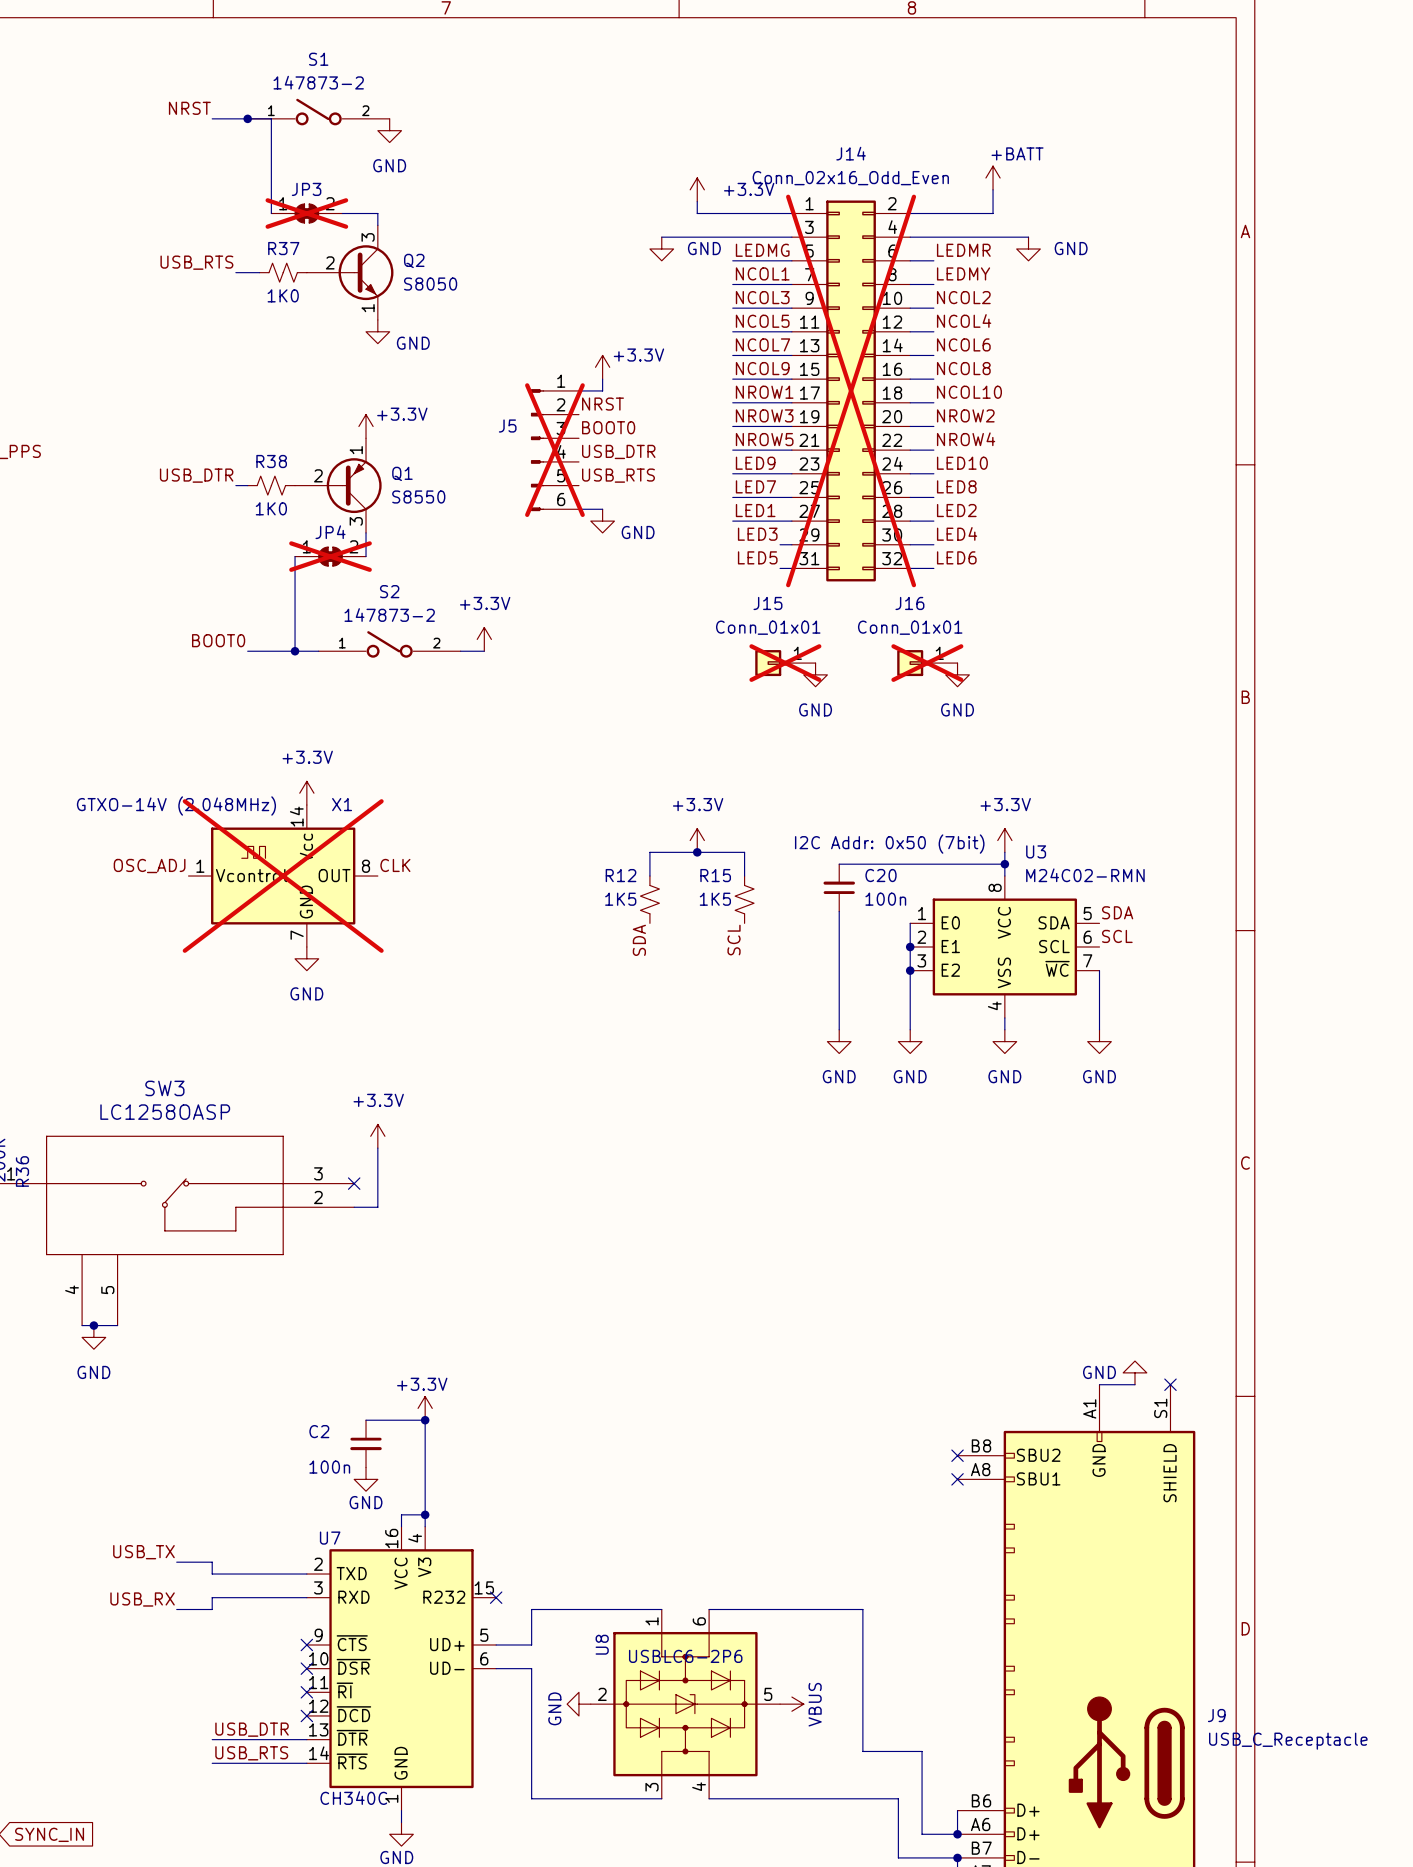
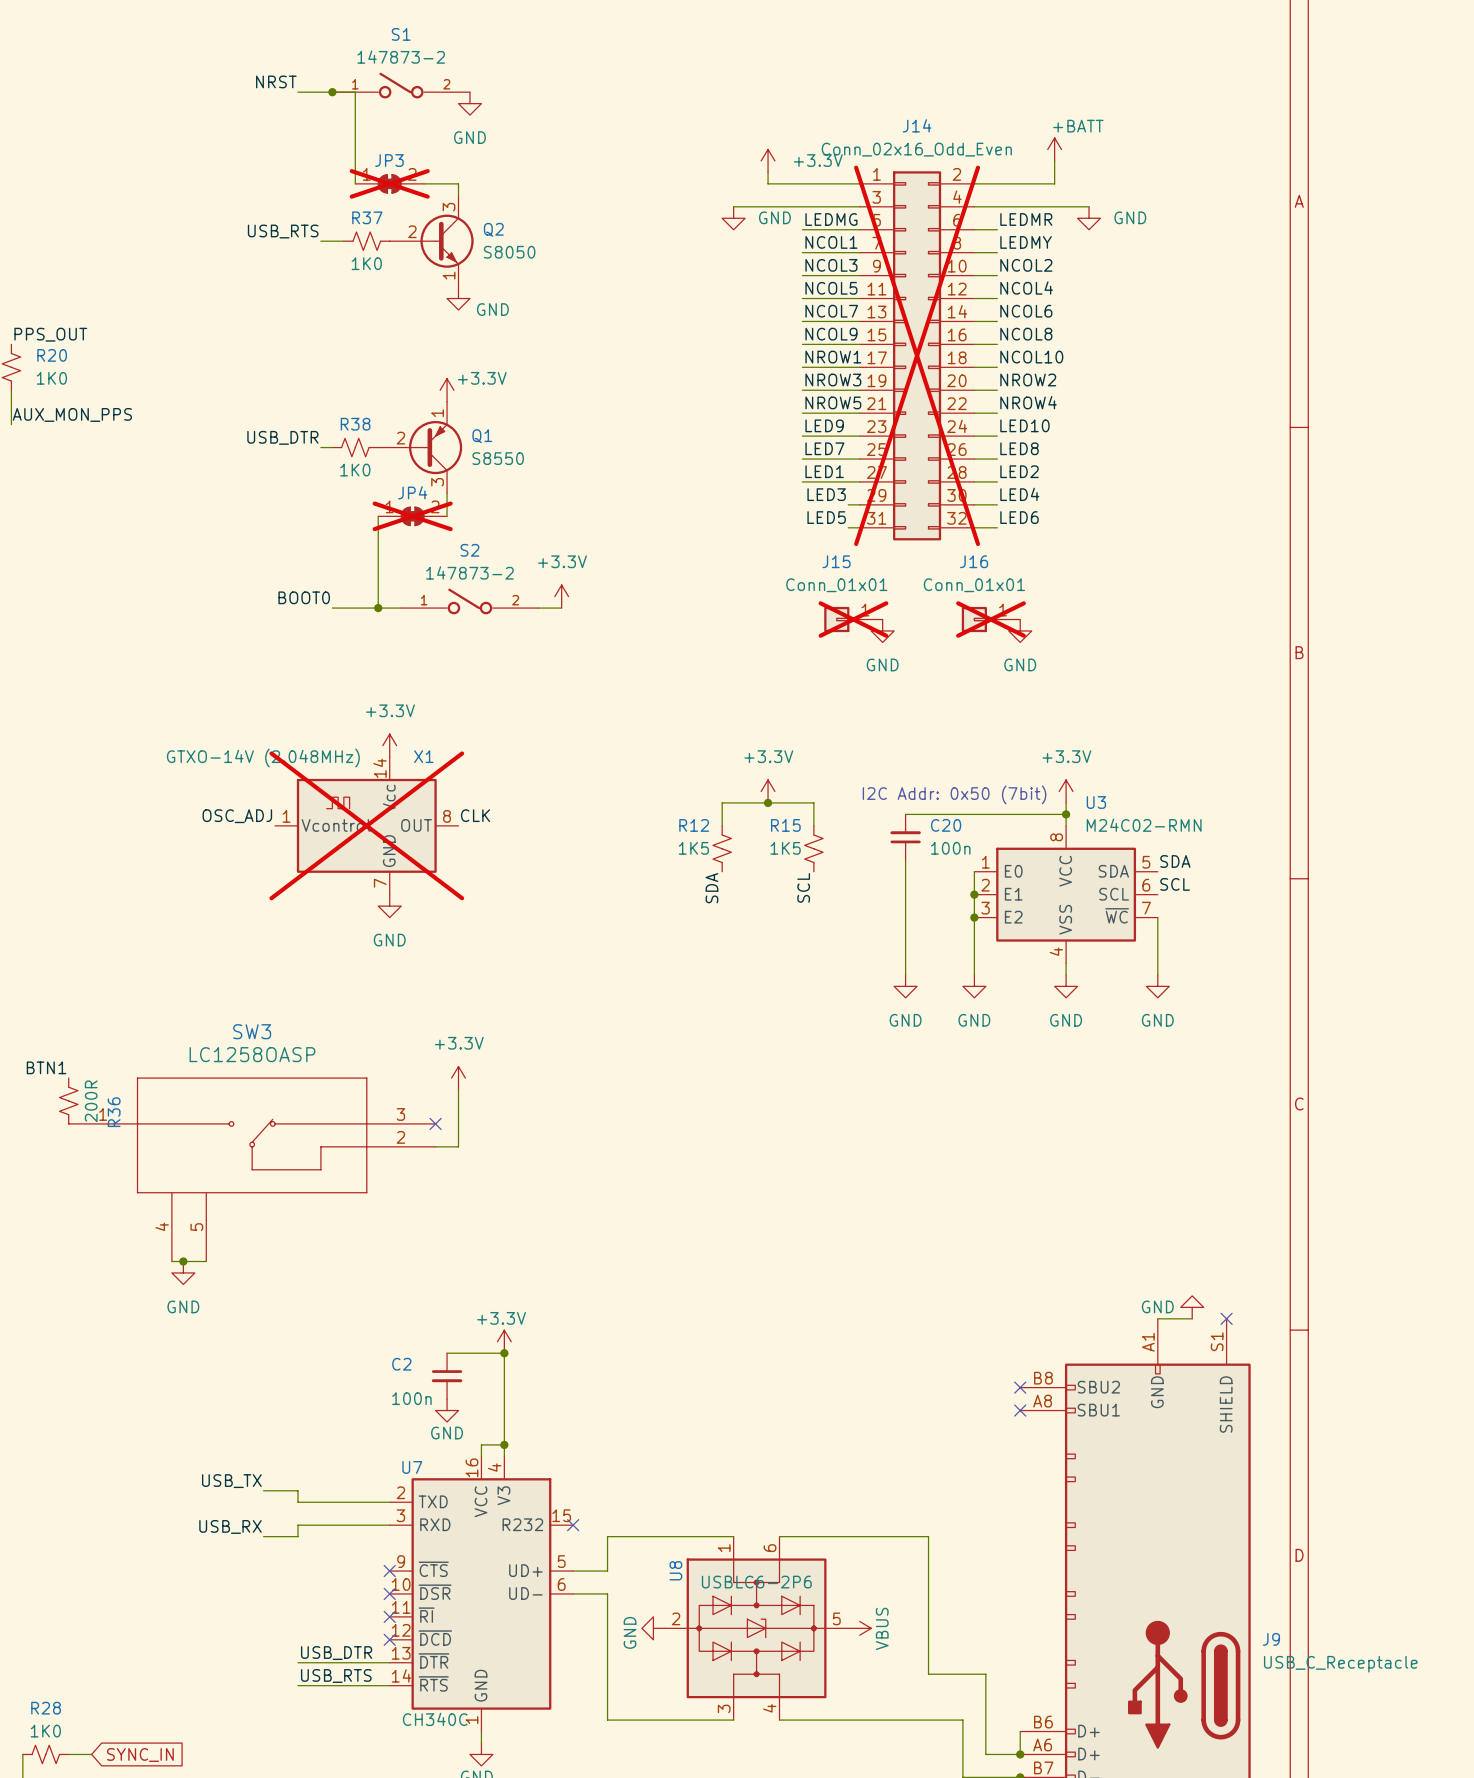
power symbol: +3.3V (602, 367) -> none
wire: (602, 379) (602, 390) (578, 390) -> none
label: NRST (602, 404) -> none
label: BOOT0 (608, 427) -> none
J5: (554, 450) -> none
label: USB_DTR (618, 451) -> none
label: USB_RTS (618, 475) -> none
wire: (578, 509) (602, 509) -> none
power symbol: GND (602, 521) -> none

